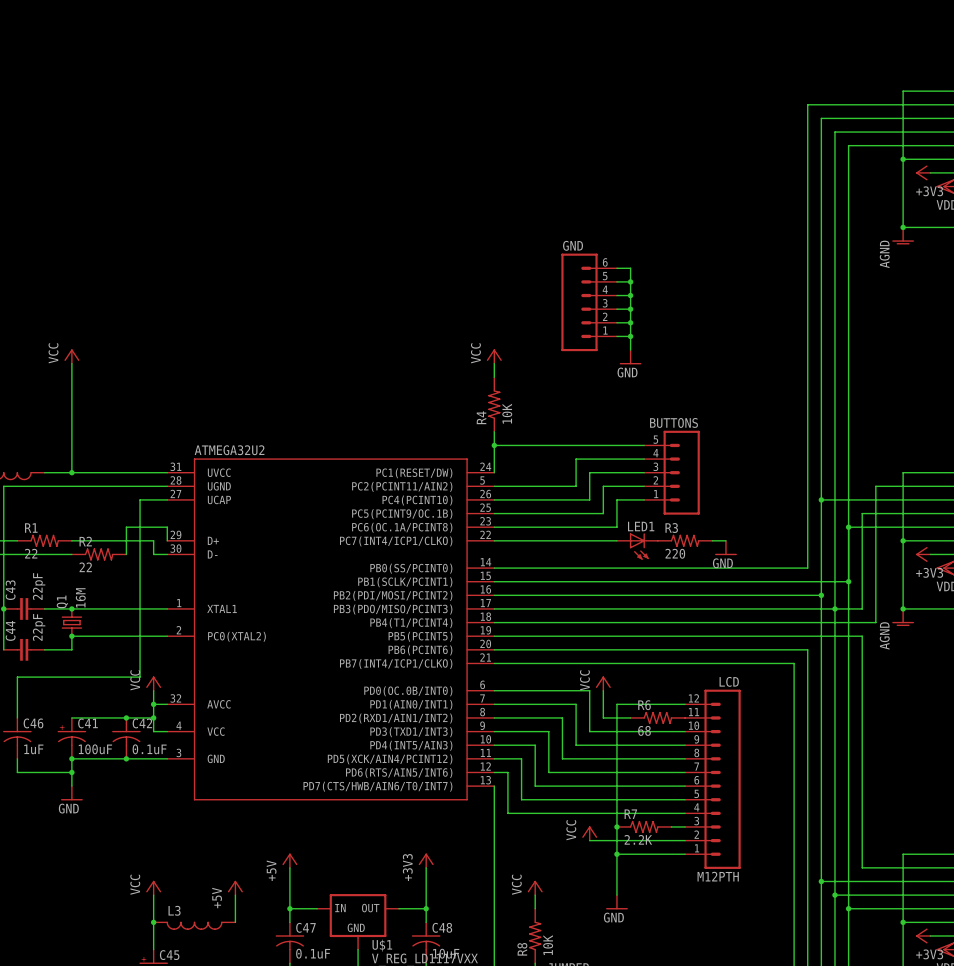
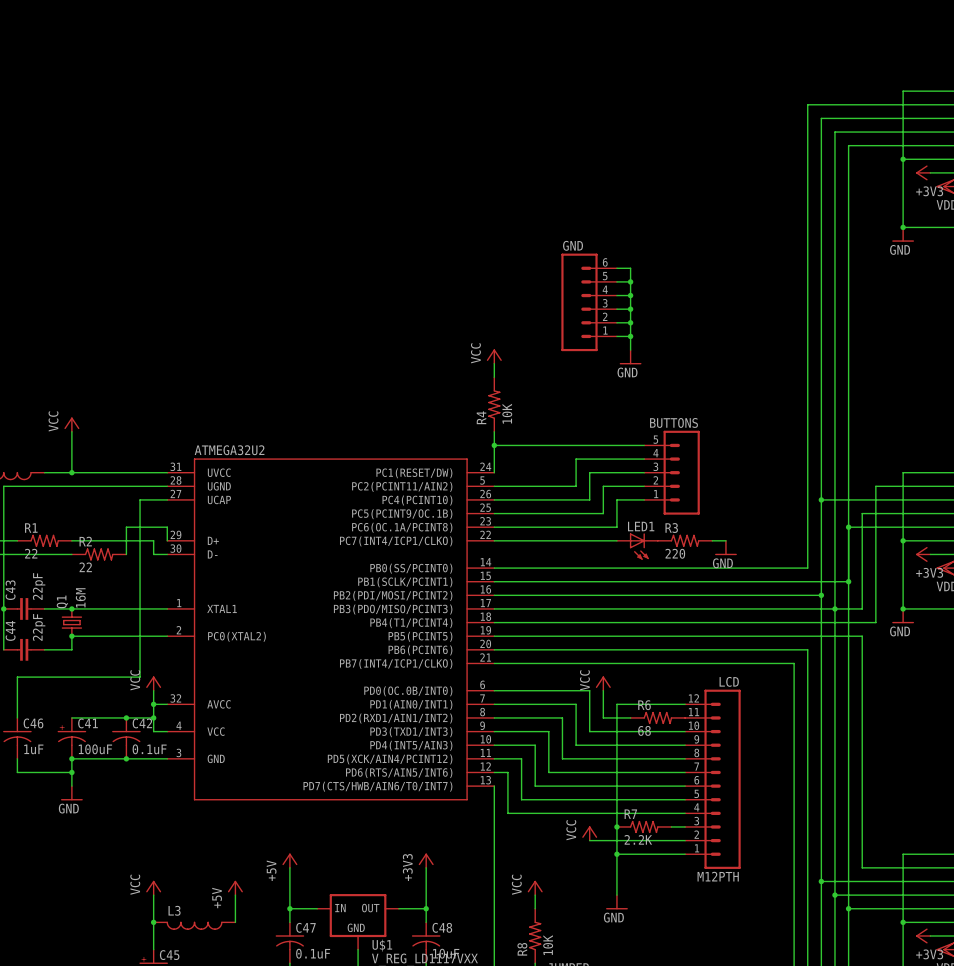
power symbol: AGND (903, 235) -> GND (903, 234)
power symbol position: VCC (71, 356) -> VCC (71, 424)
wire: (71, 363) (71, 431) -> none
power symbol: AGND (903, 617) -> GND (903, 616)

